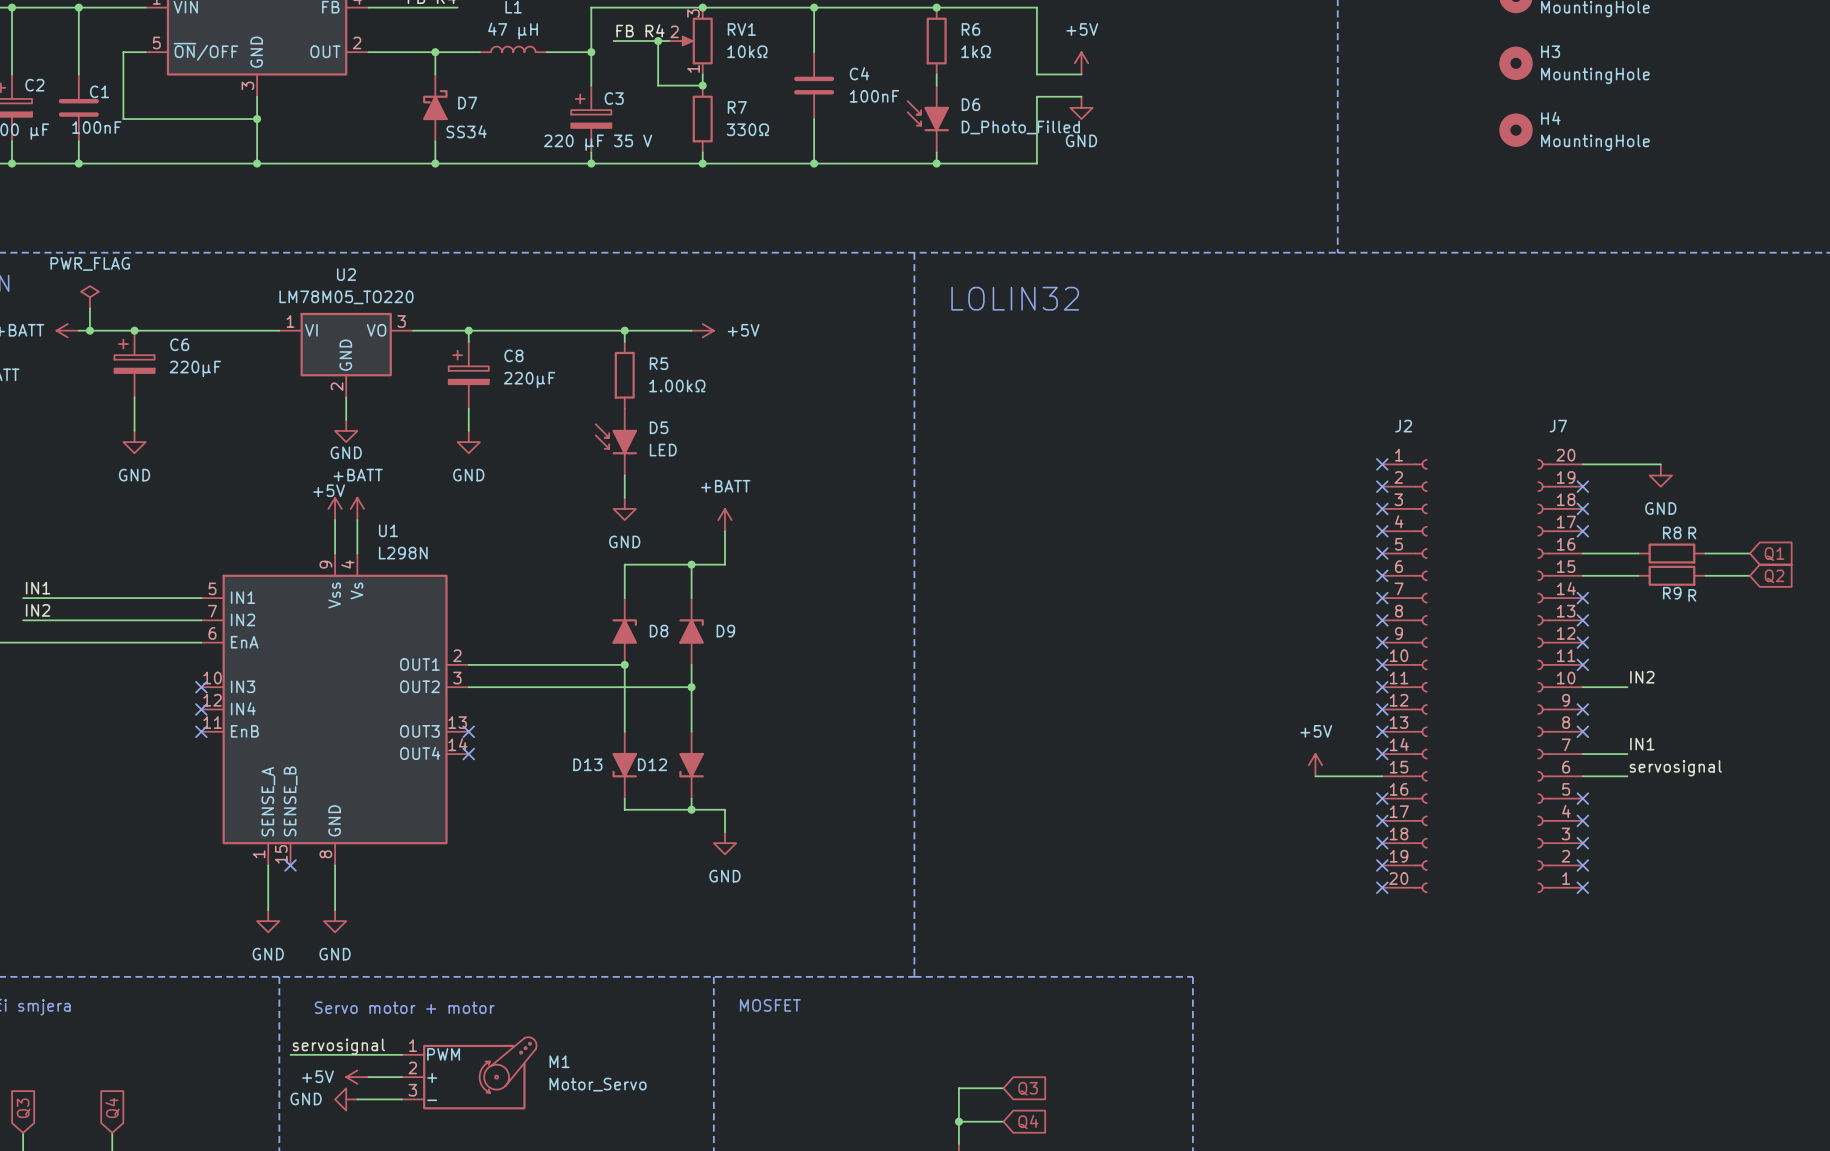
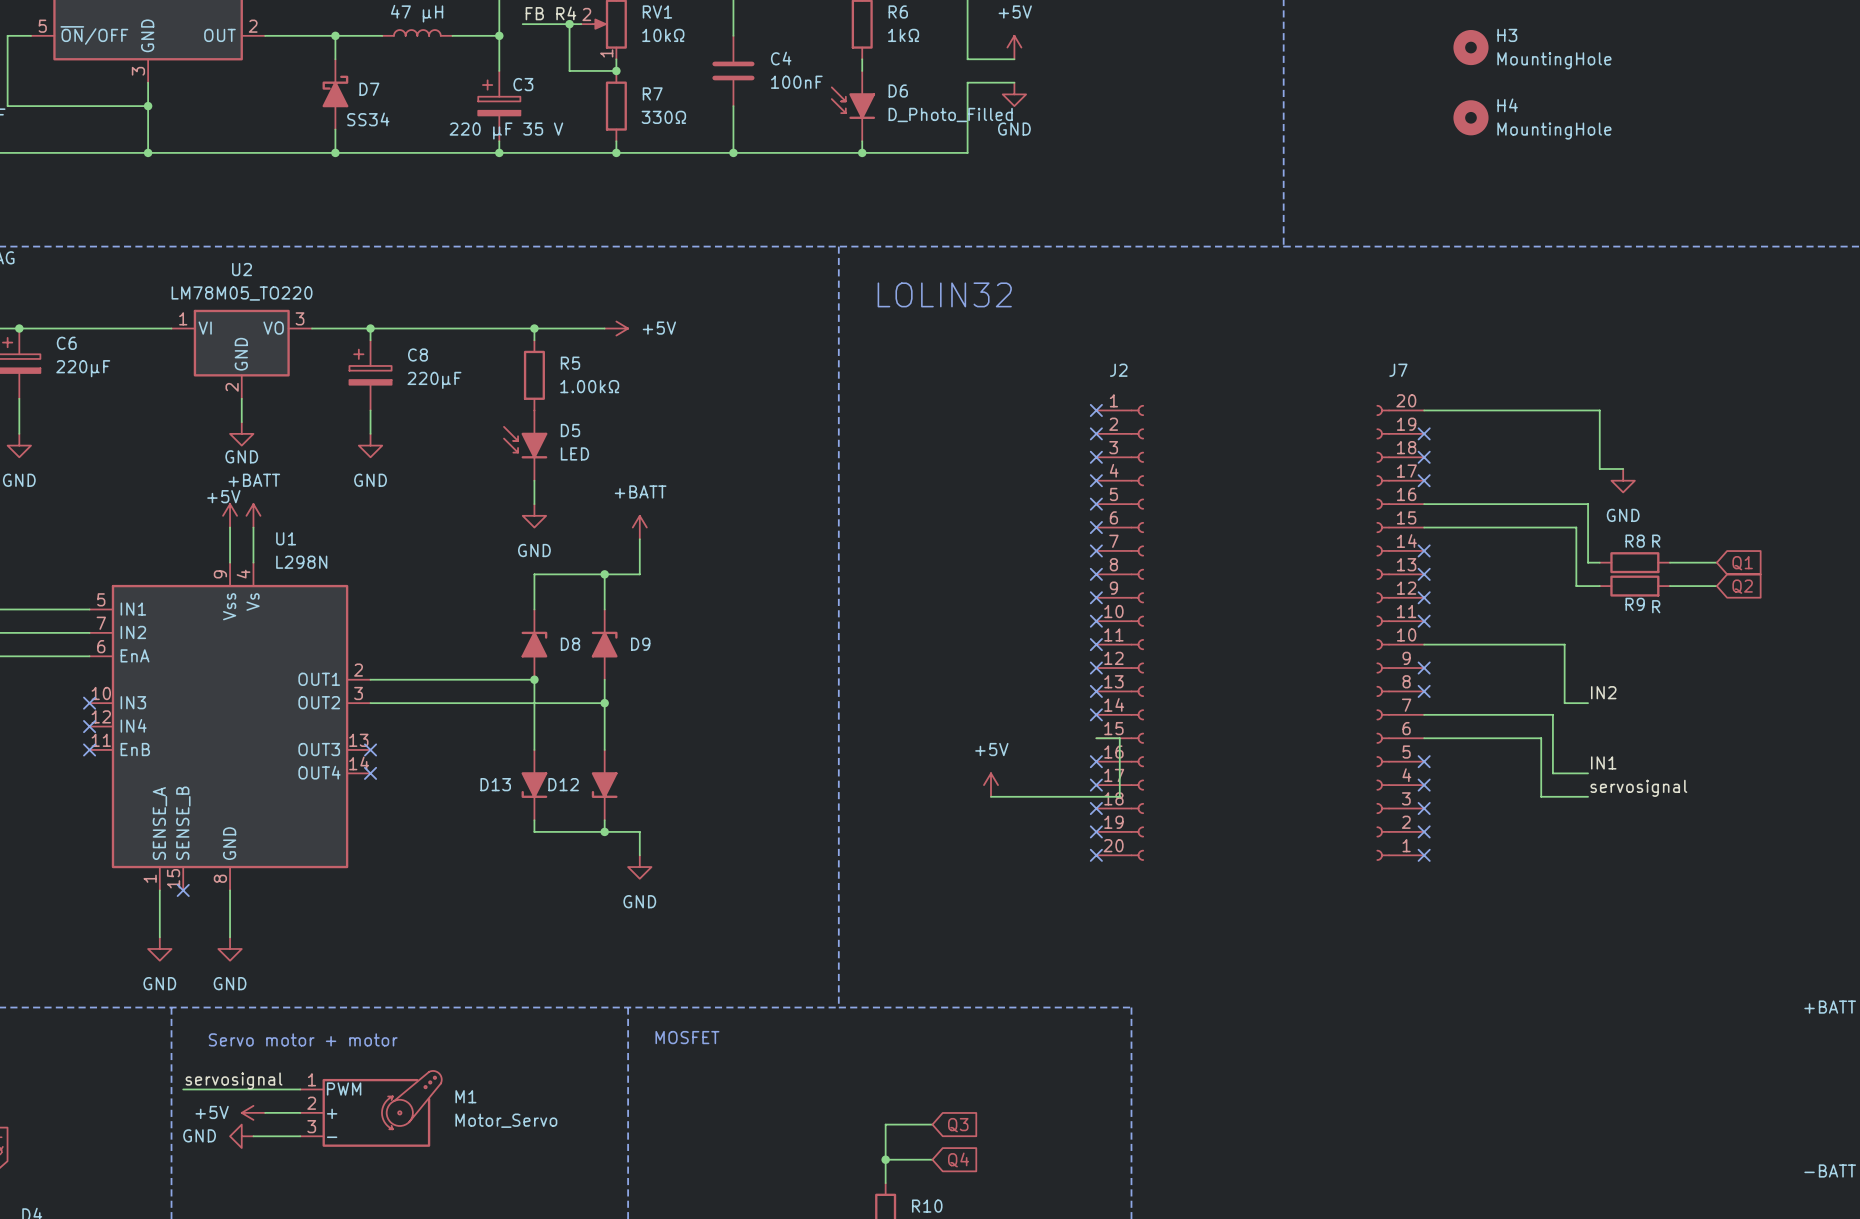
no-connect mark: none -> (1096, 410)
no-connect mark: none -> (1096, 433)
no-connect mark: none -> (1424, 433)
no-connect mark: none -> (1096, 457)
no-connect mark: none -> (1424, 457)
no-connect mark: (1382, 464) -> none
wire: (1582, 464) (1638, 464) -> (1424, 410) (1599, 410) (1599, 469)
no-connect mark: none -> (1096, 480)
no-connect mark: none -> (1424, 480)
no-connect mark: (1382, 486) -> none
no-connect mark: (1582, 486) -> none
no-connect mark: none -> (1096, 504)
no-connect mark: (1382, 508) -> none
no-connect mark: (1582, 508) -> none
no-connect mark: none -> (1096, 527)
no-connect mark: (1382, 531) -> none
no-connect mark: (1582, 531) -> none
no-connect mark: none -> (1096, 550)
no-connect mark: none -> (1424, 550)
no-connect mark: (1382, 553) -> none
wire: (1582, 553) (1627, 553) -> (1424, 504) (1588, 504) (1588, 562)
no-connect mark: none -> (1096, 574)
no-connect mark: none -> (1424, 574)
no-connect mark: (1382, 575) -> none
wire: (1582, 575) (1616, 575) -> (1424, 527) (1576, 527) (1576, 586)
no-connect mark: none -> (1096, 597)
no-connect mark: none -> (1424, 597)
no-connect mark: (1382, 598) -> none
no-connect mark: (1582, 598) -> none
no-connect mark: none -> (1096, 621)
no-connect mark: none -> (1424, 621)
no-connect mark: (1382, 620) -> none
no-connect mark: (1582, 620) -> none
no-connect mark: none -> (1096, 644)
no-connect mark: (1382, 642) -> none
no-connect mark: (1582, 642) -> none
no-connect mark: none -> (1096, 668)
no-connect mark: none -> (1424, 668)
no-connect mark: (1382, 664) -> none
no-connect mark: (1582, 664) -> none
no-connect mark: none -> (1096, 691)
J2 position: (1404, 676) -> (1120, 632)
no-connect mark: none -> (1424, 691)
J7 position: (1560, 676) -> (1400, 632)
no-connect mark: (1382, 687) -> none
wire: (1582, 687) (1605, 687) -> (1424, 644) (1564, 644) (1564, 703)
no-connect mark: none -> (1096, 714)
no-connect mark: (1382, 709) -> none
no-connect mark: (1582, 709) -> none
wire: none -> (1096, 738) (1119, 738) (1119, 796) (991, 796)
wire: none -> (1424, 738) (1541, 738) (1541, 796)
no-connect mark: (1382, 731) -> none
no-connect mark: (1582, 731) -> none
no-connect mark: none -> (1096, 761)
no-connect mark: none -> (1424, 761)
no-connect mark: (1382, 754) -> none
wire: (1582, 754) (1593, 754) -> (1424, 714) (1552, 714) (1552, 773)
power symbol: none -> +5V (991, 785)
no-connect mark: none -> (1096, 785)
power symbol: +5V (1315, 765) -> none
no-connect mark: none -> (1424, 785)
wire: (1315, 776) (1382, 776) -> none
no-connect mark: none -> (1096, 808)
no-connect mark: none -> (1424, 808)
no-connect mark: (1382, 798) -> none
no-connect mark: (1582, 798) -> none
no-connect mark: none -> (1096, 831)
no-connect mark: none -> (1424, 831)
no-connect mark: (1382, 820) -> none
no-connect mark: (1582, 820) -> none
no-connect mark: none -> (1096, 855)
no-connect mark: none -> (1424, 855)
no-connect mark: (1382, 843) -> none
no-connect mark: (1582, 843) -> none
no-connect mark: (1382, 865) -> none
no-connect mark: (1582, 865) -> none
no-connect mark: (1382, 887) -> none
no-connect mark: (1582, 887) -> none

